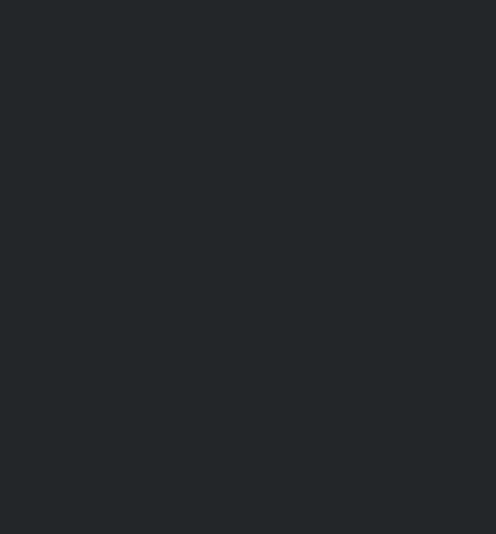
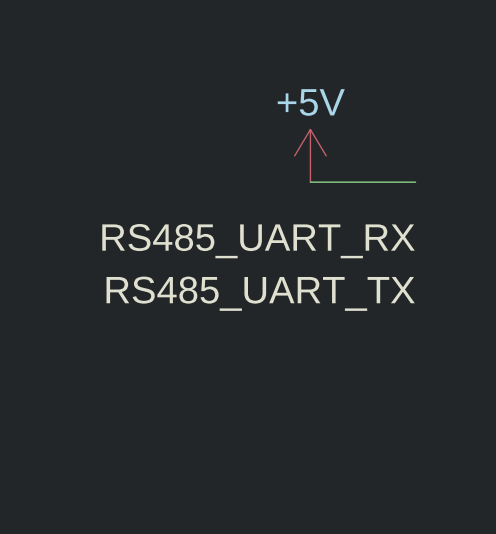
power symbol: none -> +5V (310, 155)
wire: none -> (310, 182) (415, 182)
label: none -> RS485_UART_RX (258, 241)
label: none -> RS485_UART_TX (260, 293)

